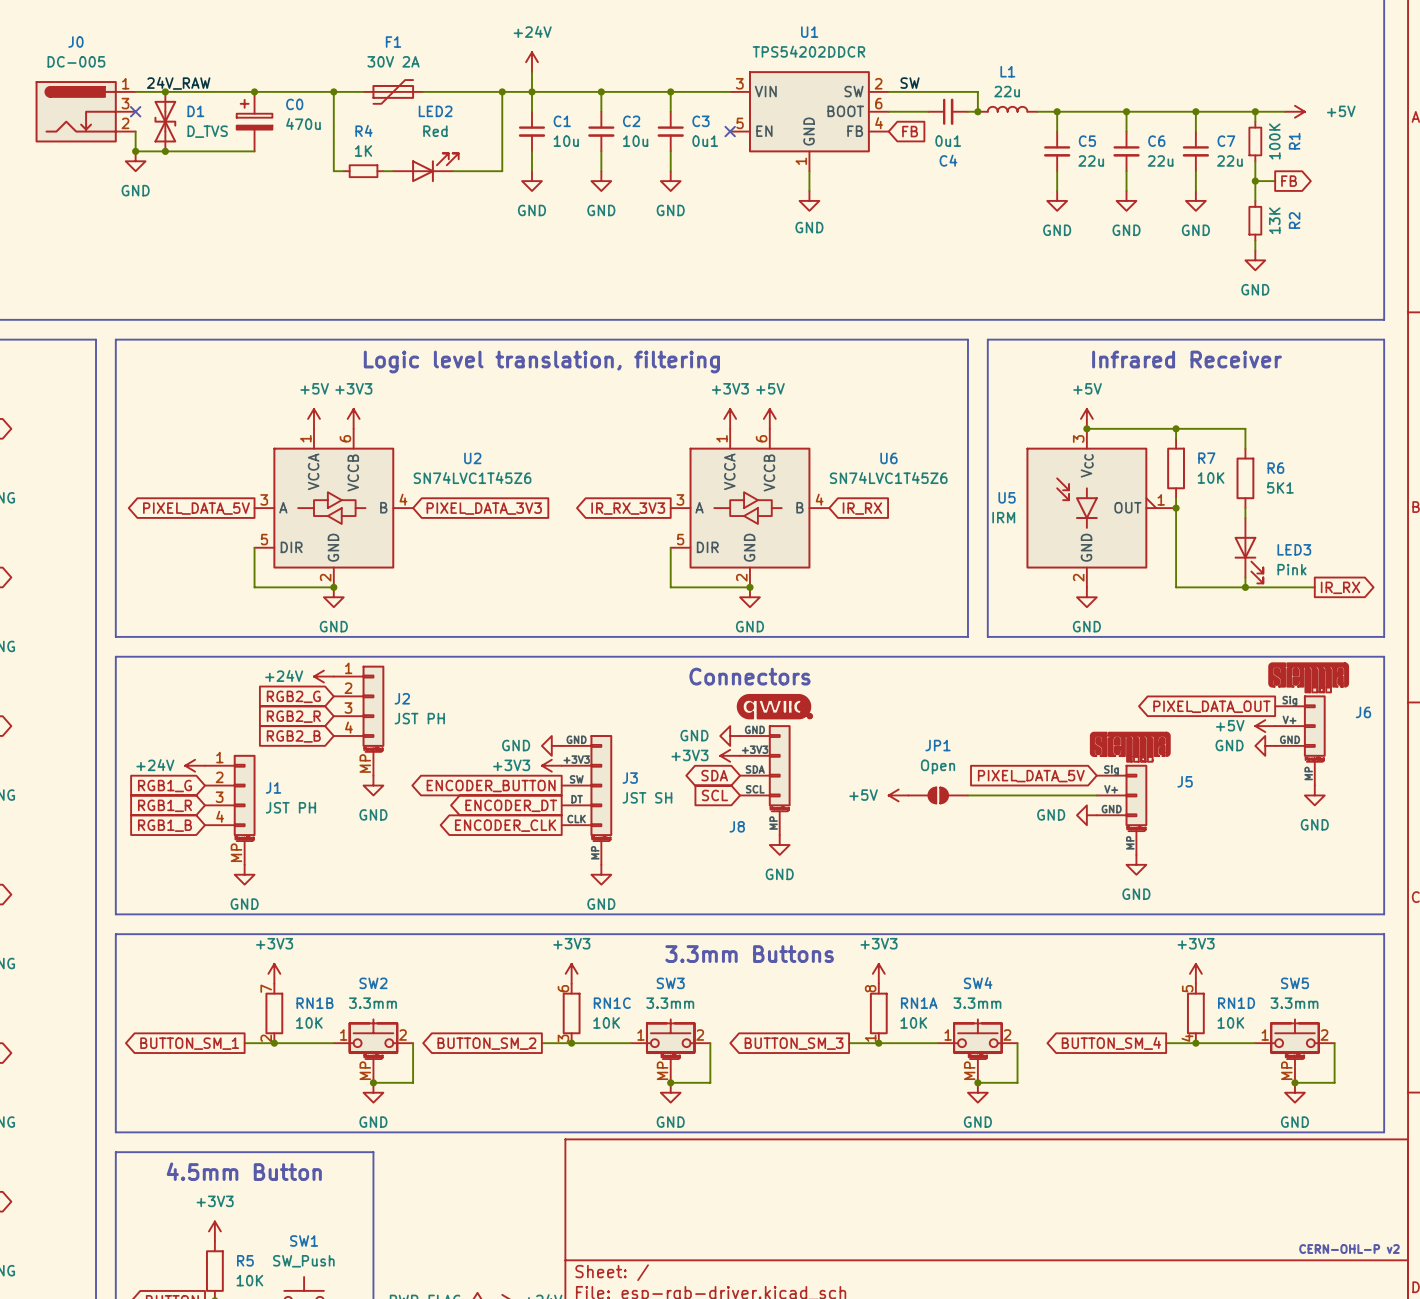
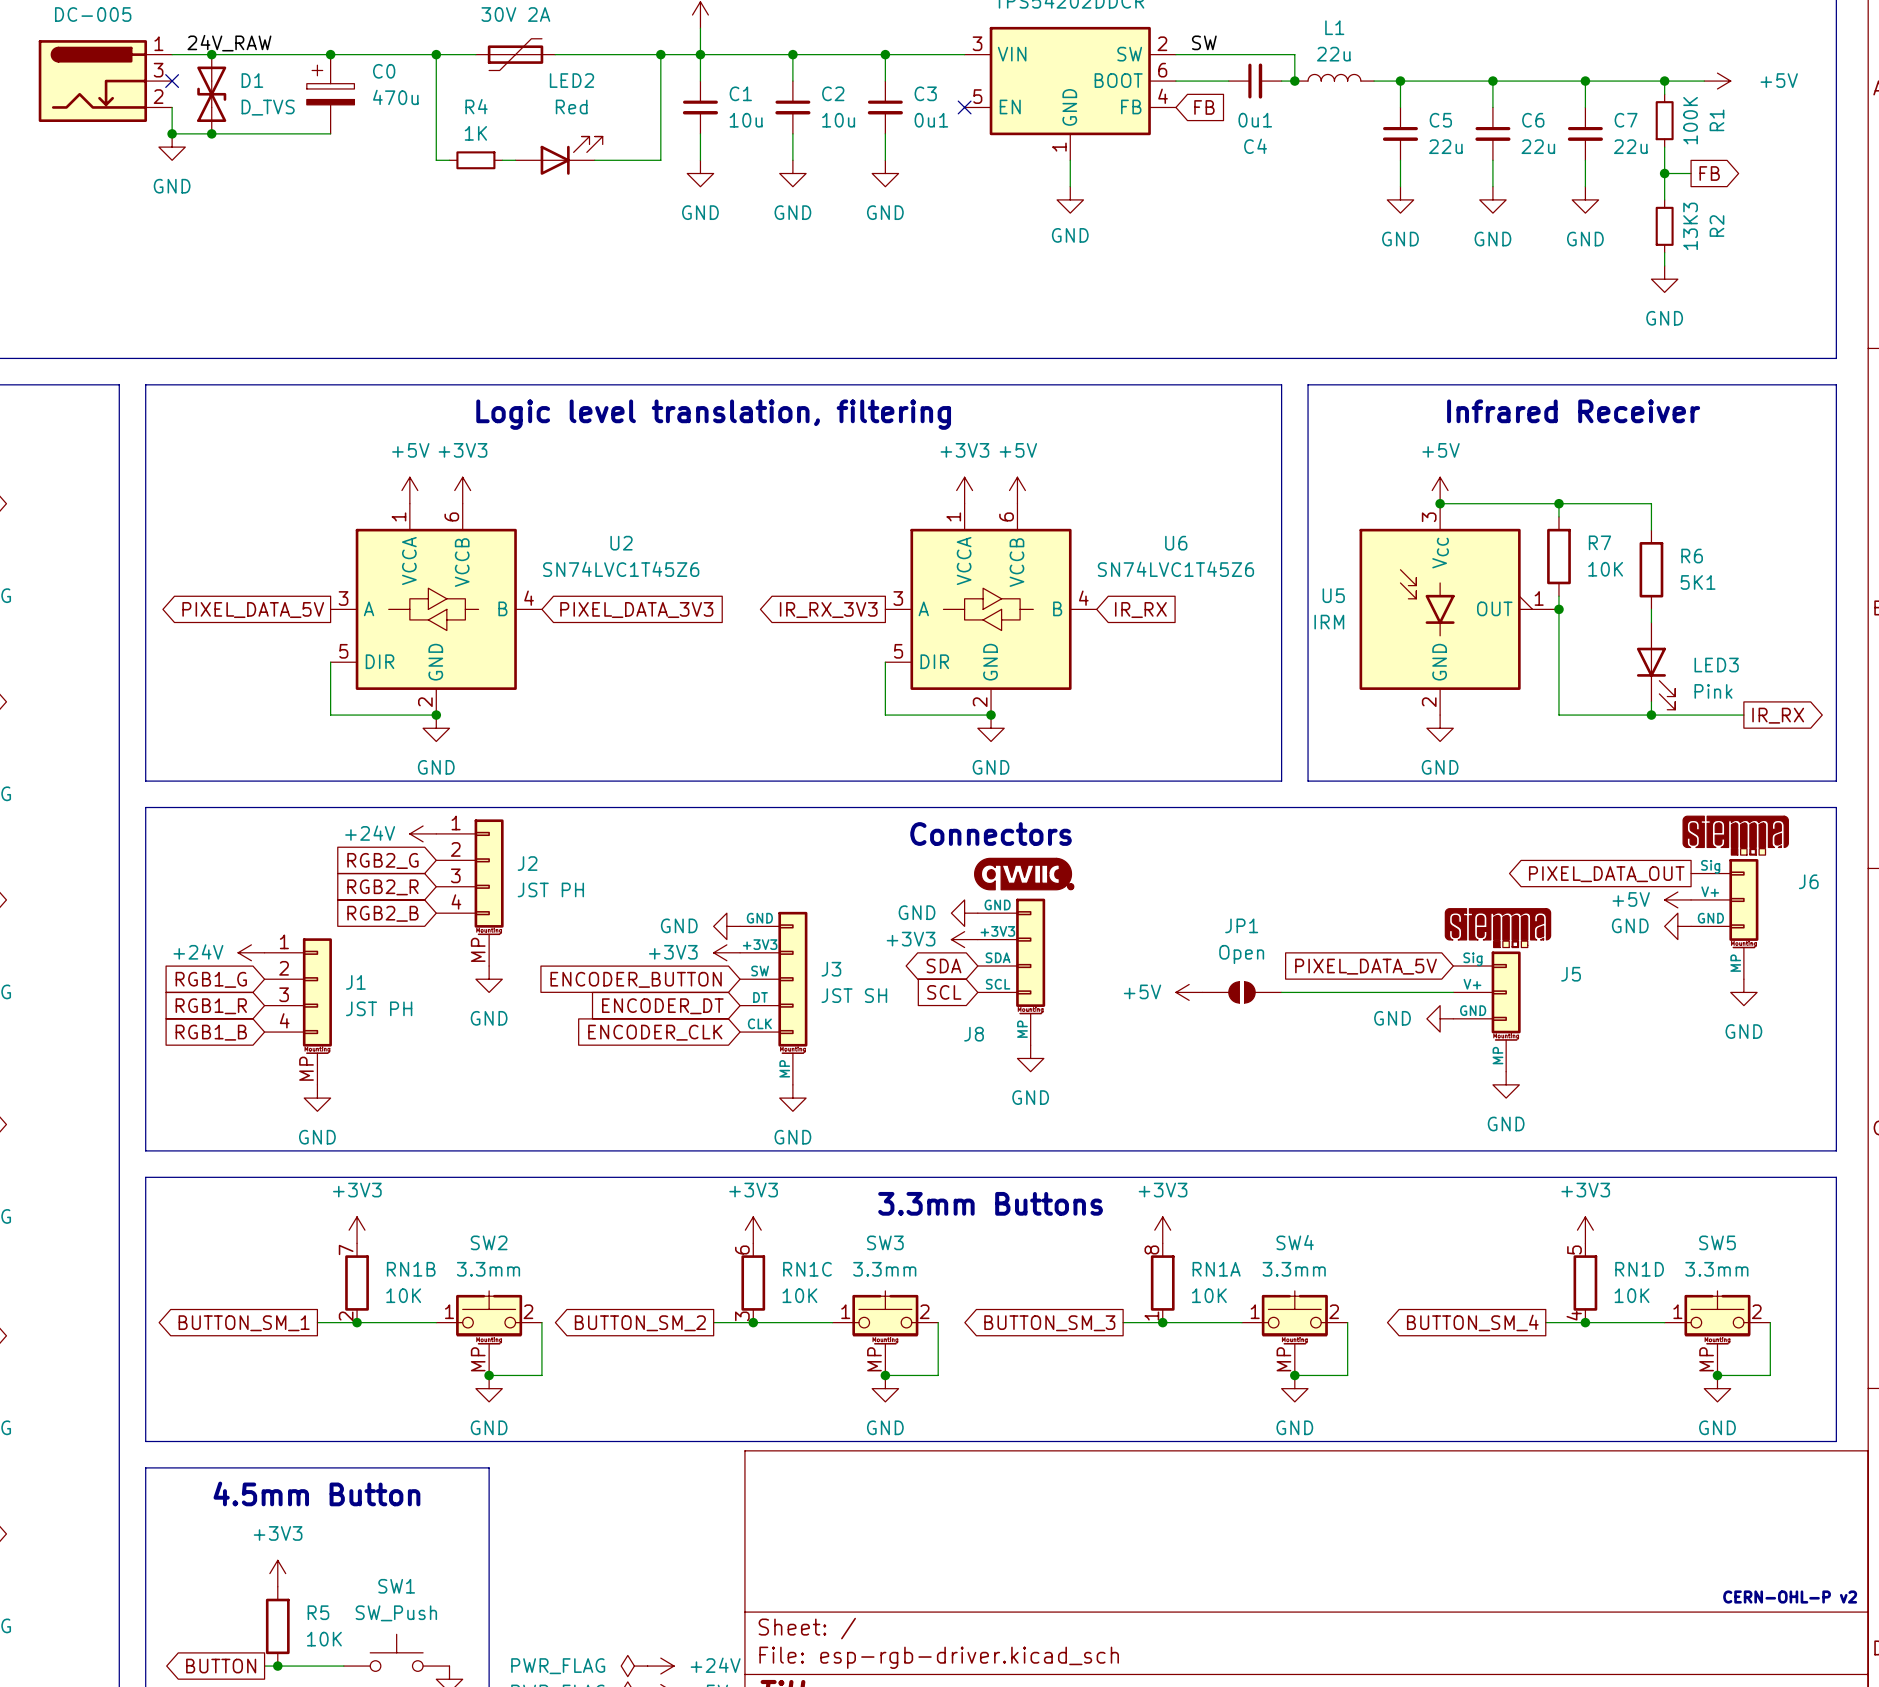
R2 value: 13K (1274, 220) -> 13K3 (1690, 226)
global label shape: output (491, 786) -> input (636, 979)
global label shape: output (511, 805) -> input (662, 1006)
global label shape: output (505, 825) -> input (655, 1032)

